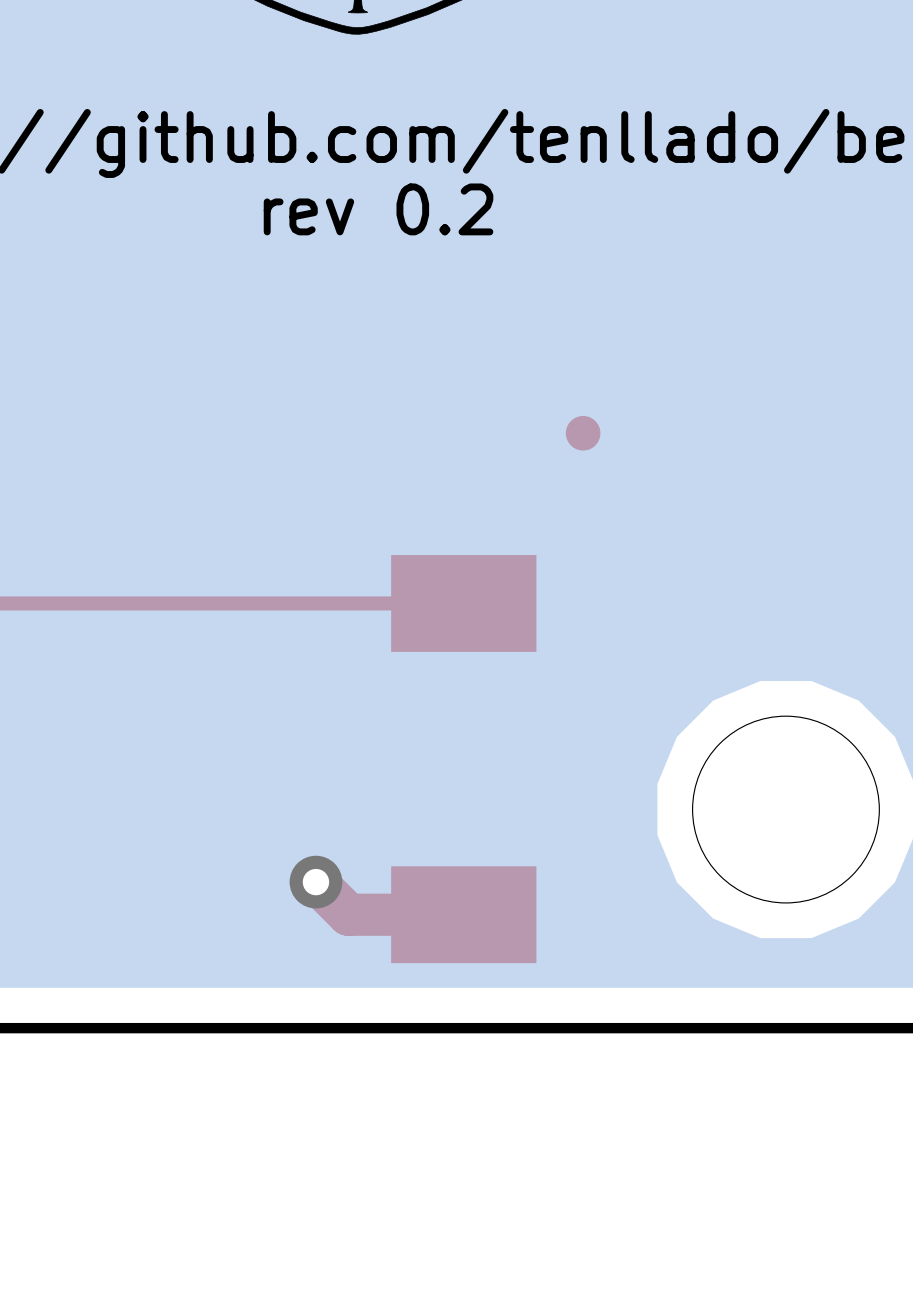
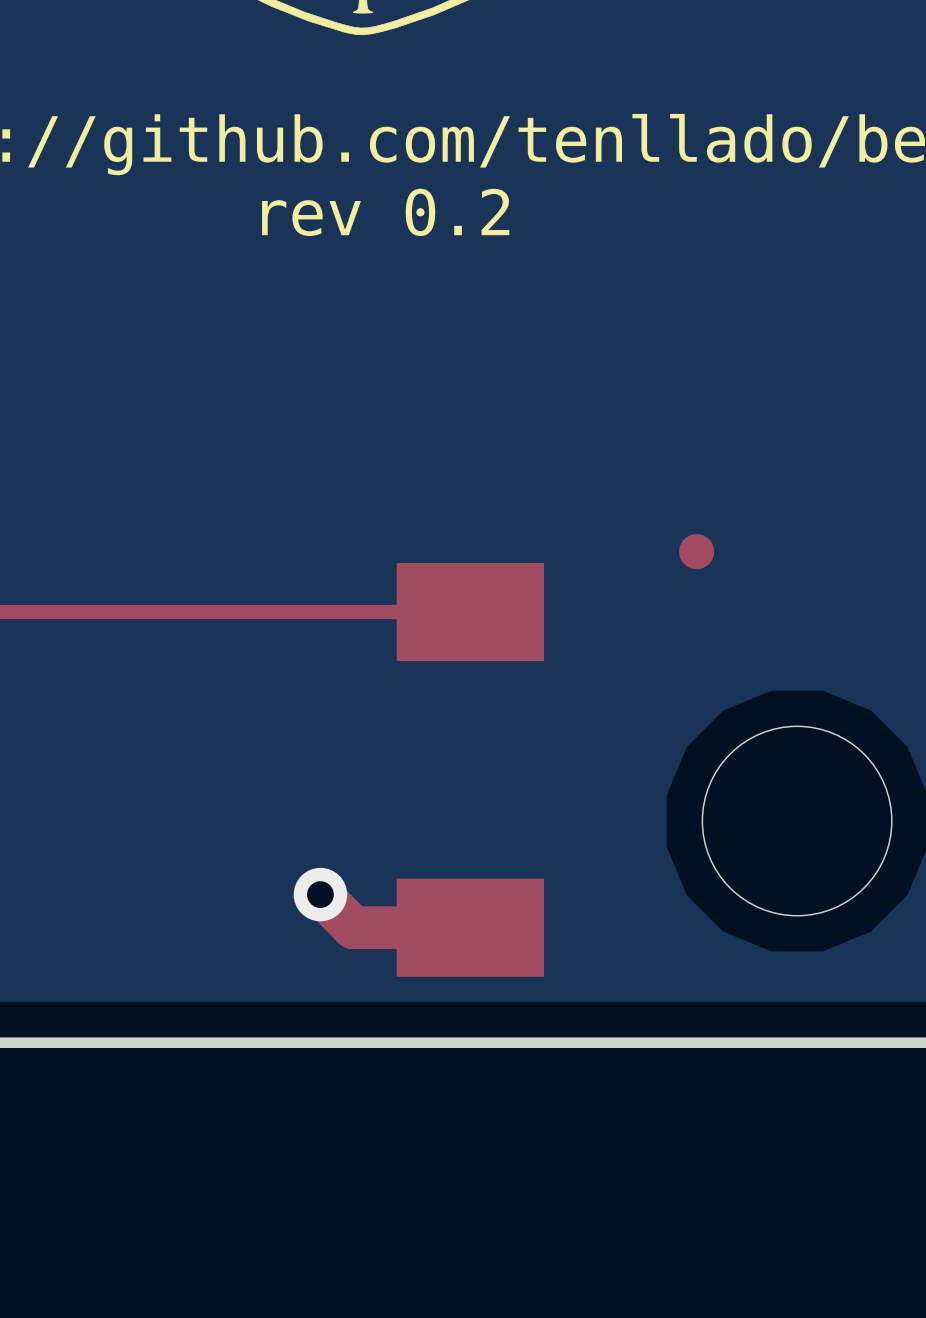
part position: (583, 433) -> (696, 551)

